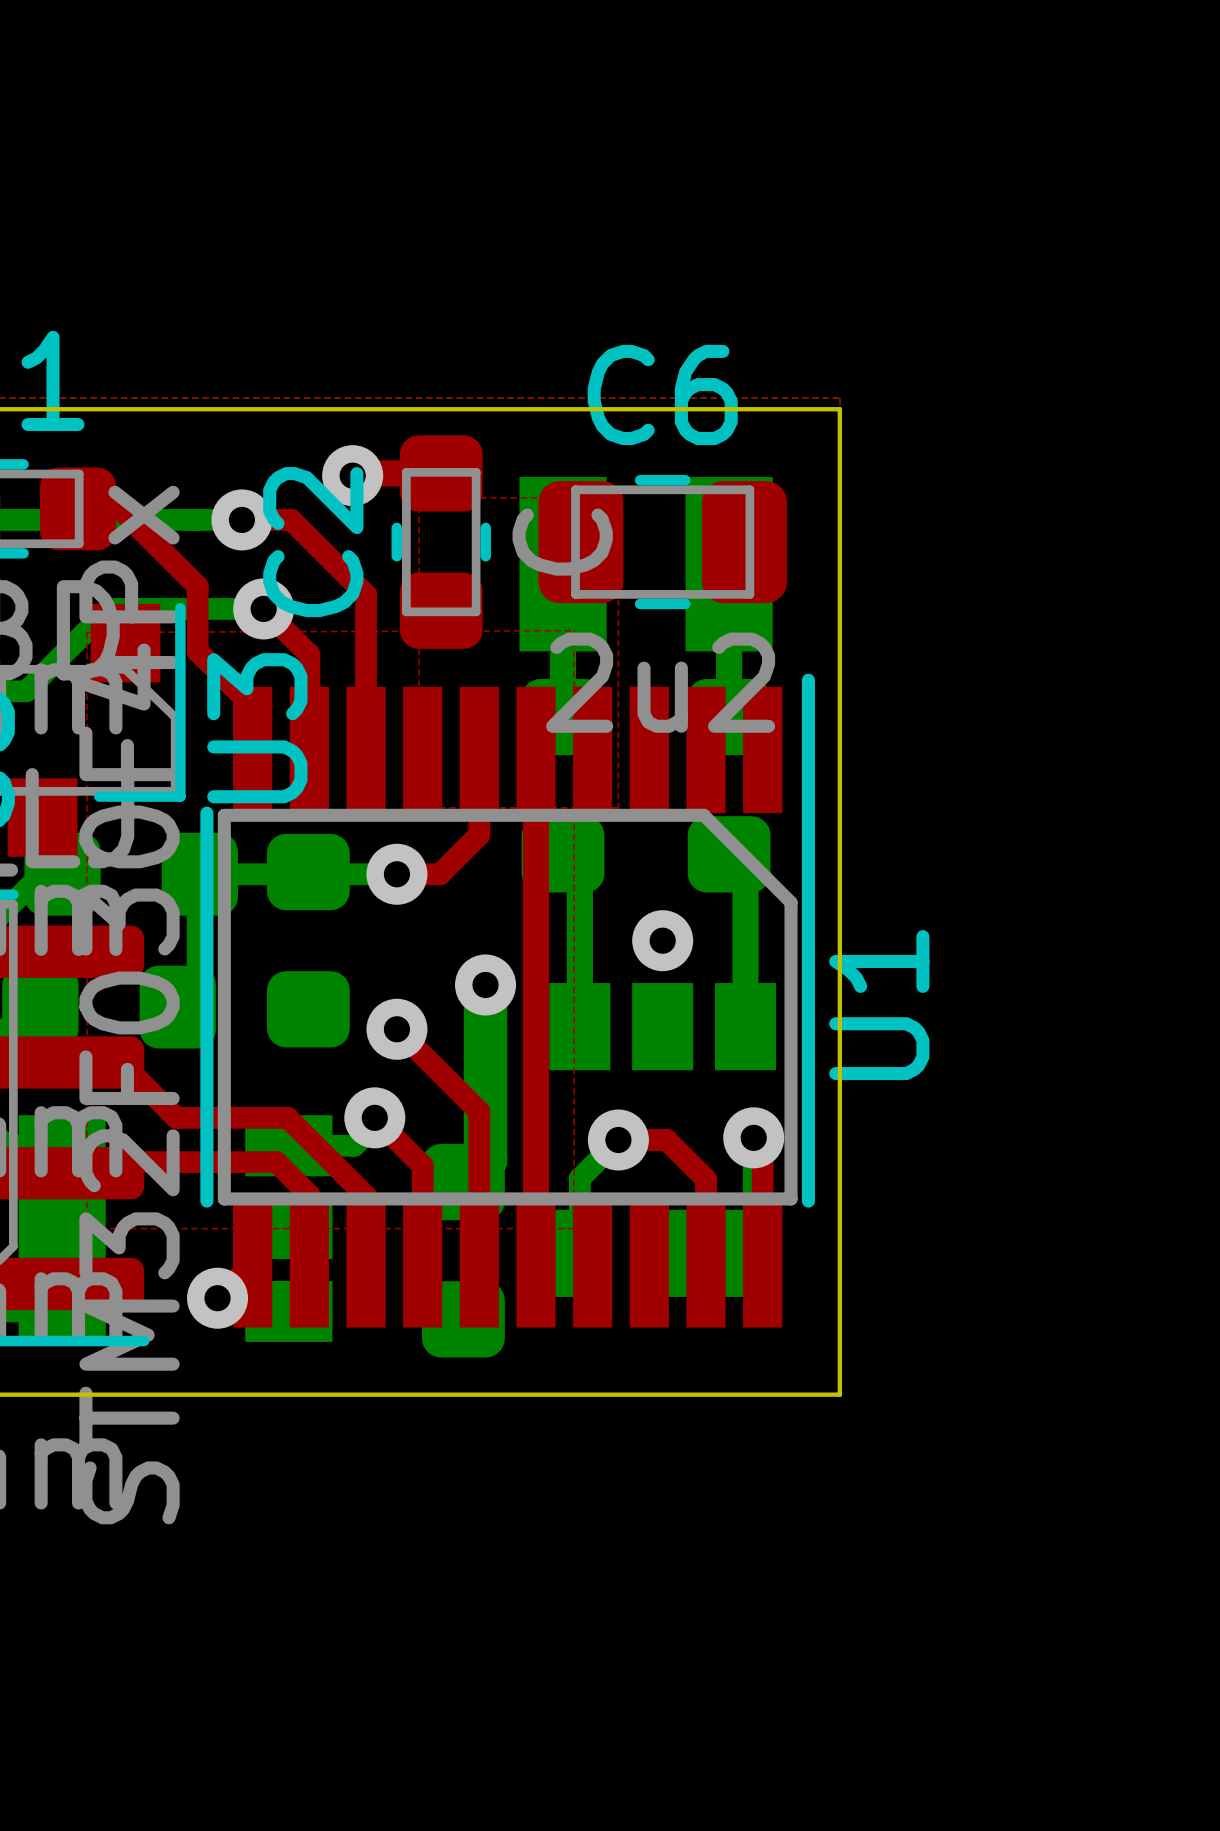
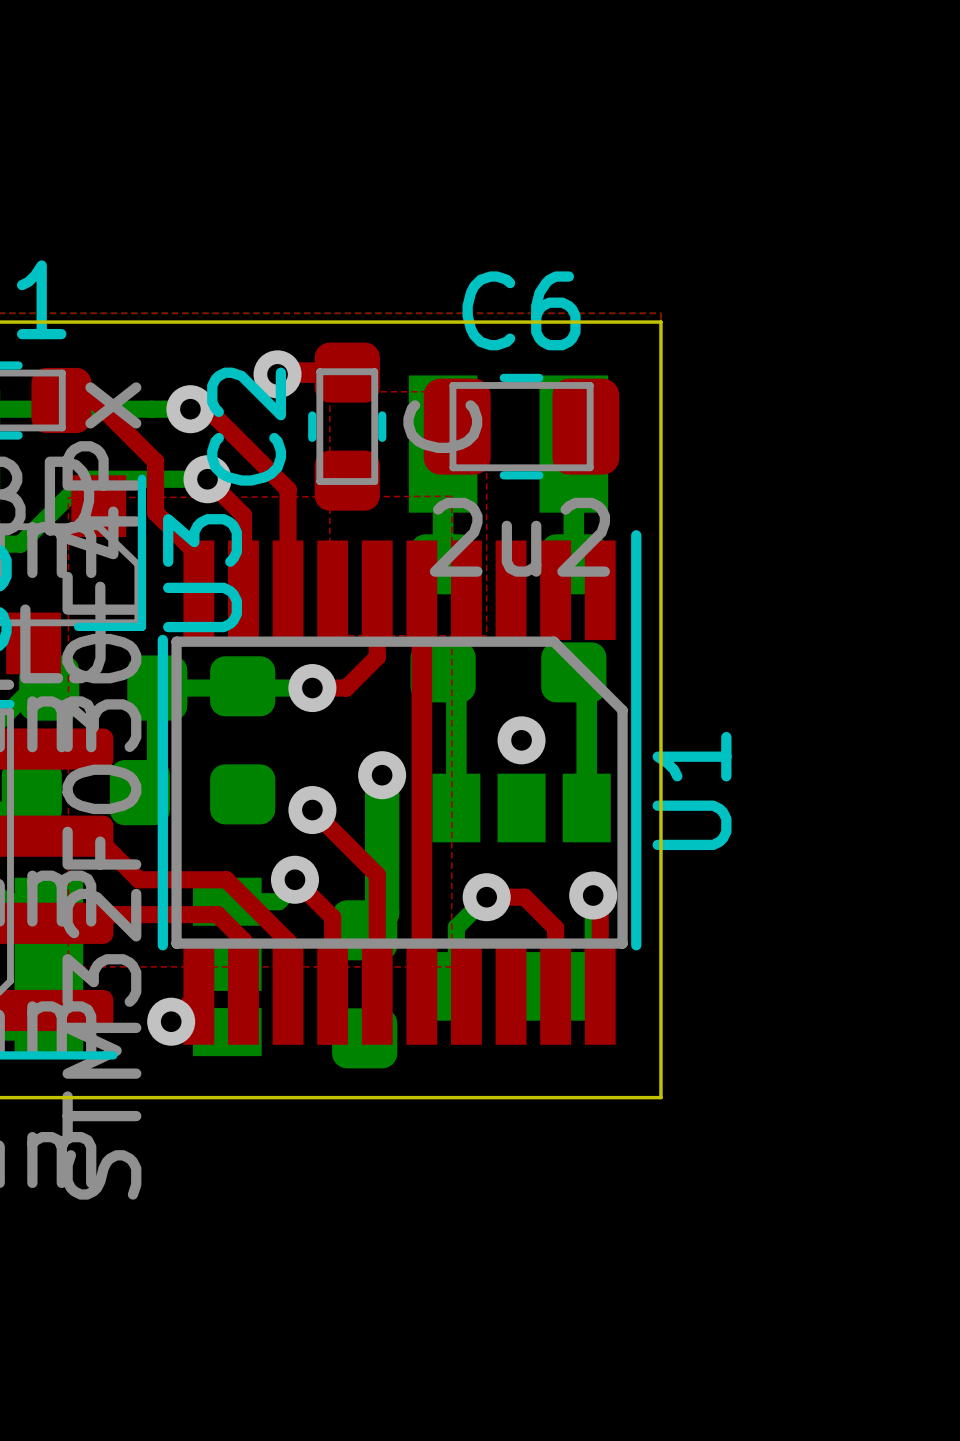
top track: (264, 519) (291, 519) (366, 594) (366, 621) -> (207, 409) (288, 489)

